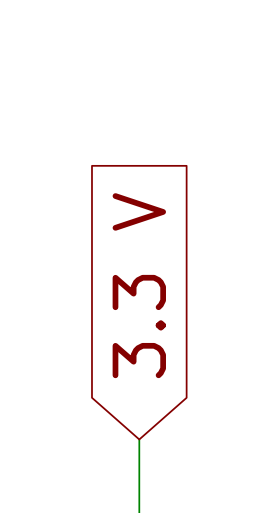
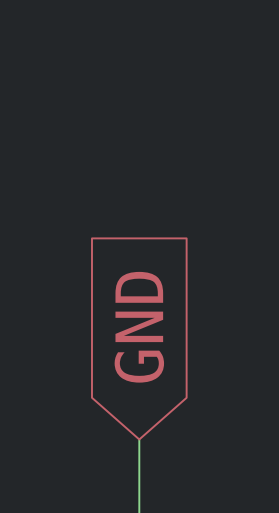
global label: 3.3 V (139, 285) -> GND (139, 327)

